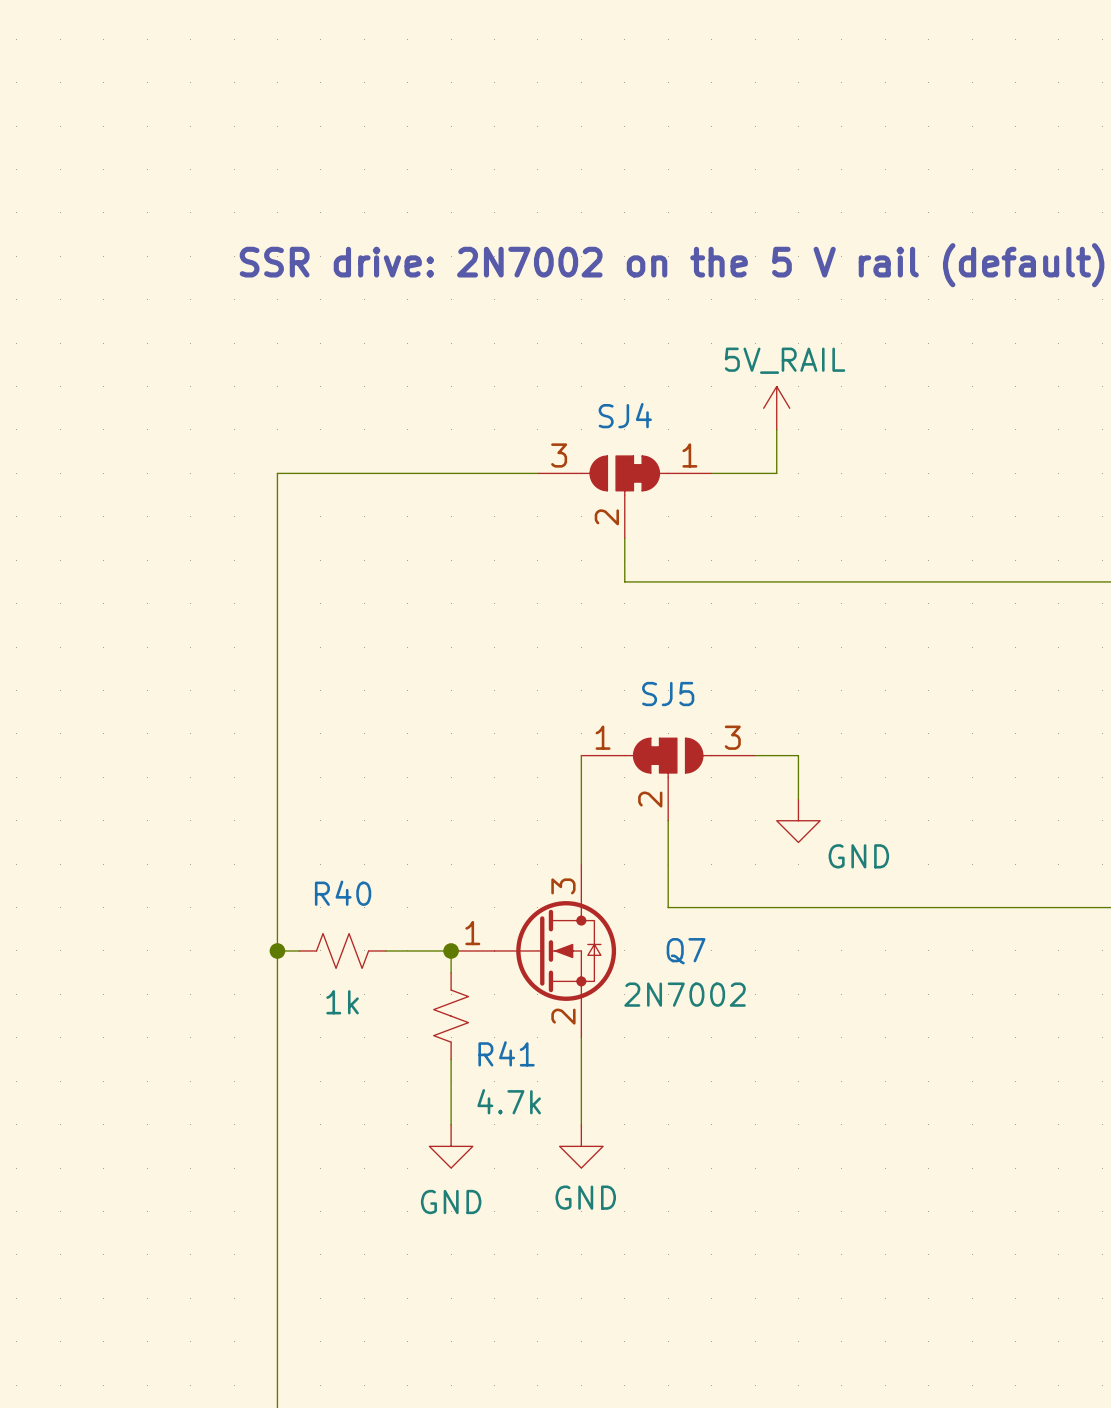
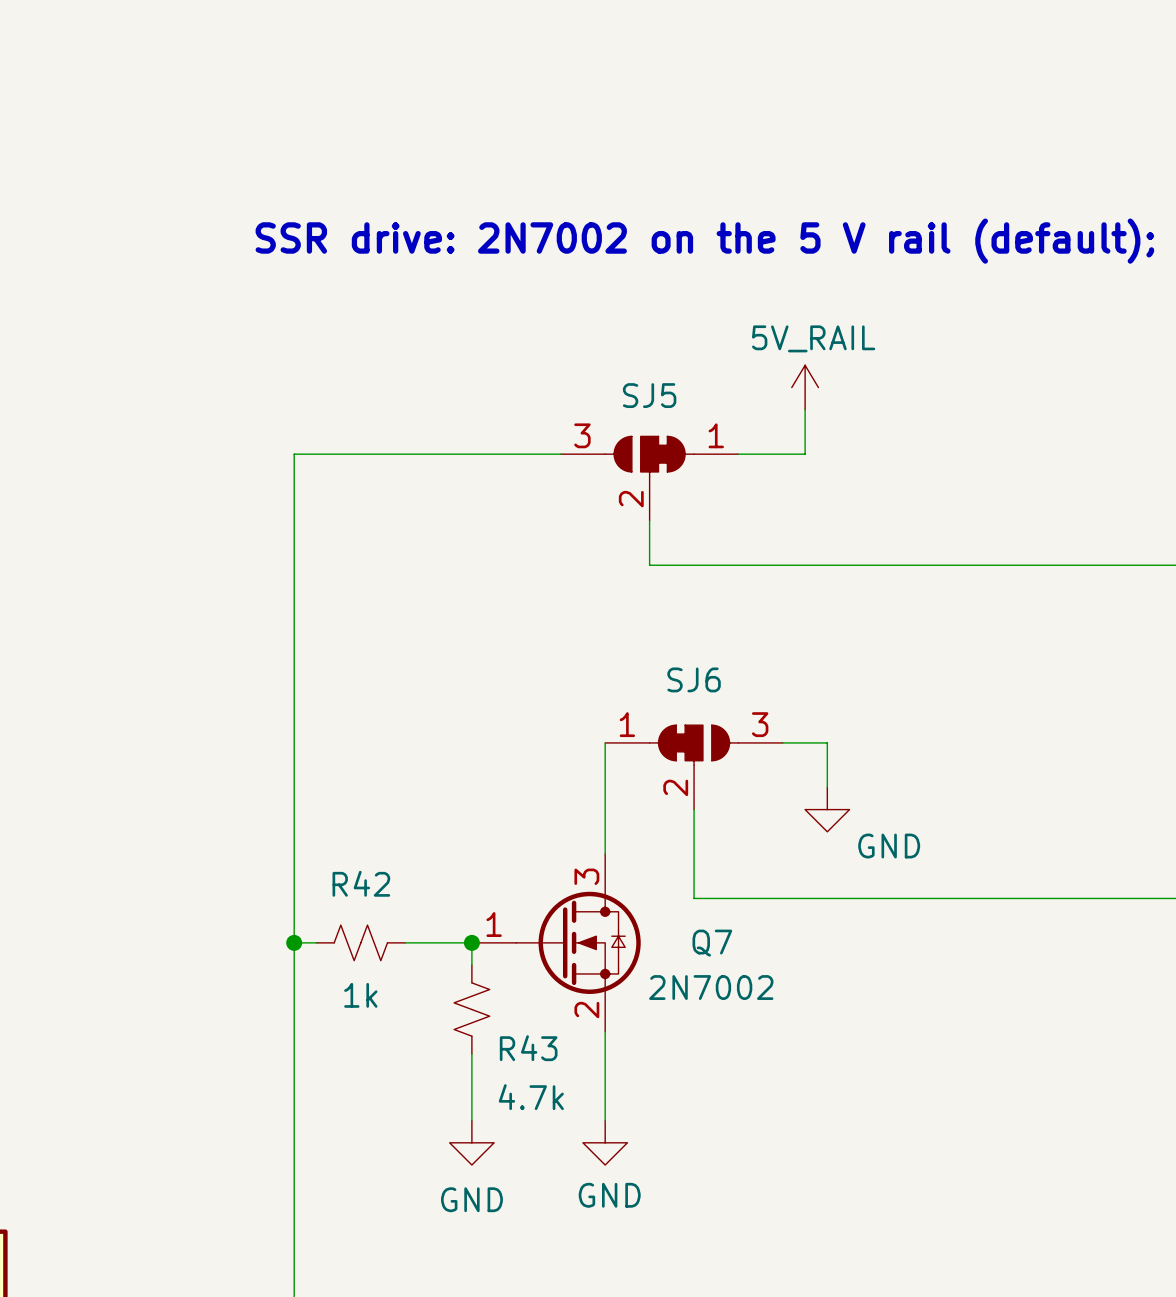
SJ4 name: SJ4 (625, 415) -> SJ5 (649, 395)
SJ5 name: SJ5 (668, 694) -> SJ6 (694, 679)
R40 name: R40 (343, 893) -> R42 (361, 883)
R41 name: R41 (506, 1053) -> R43 (528, 1048)

